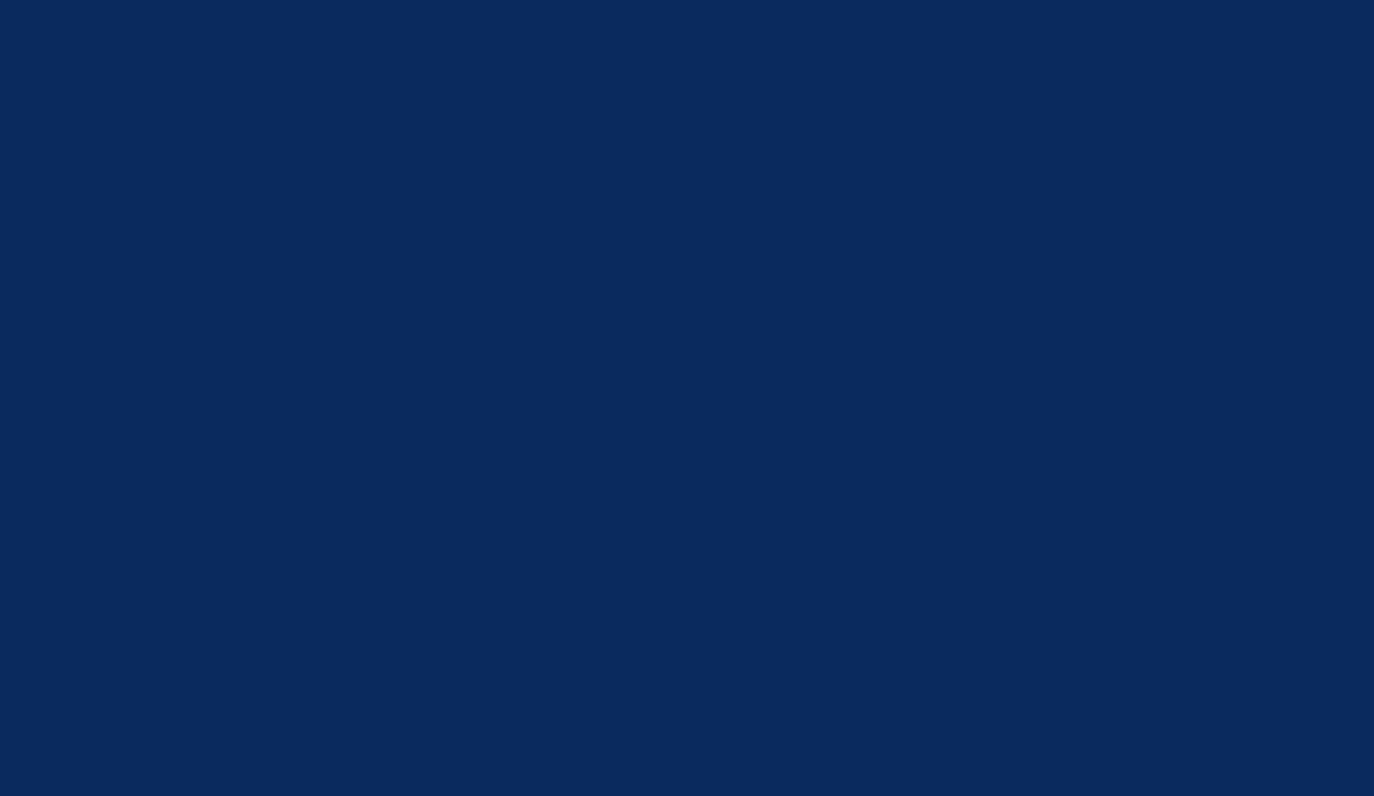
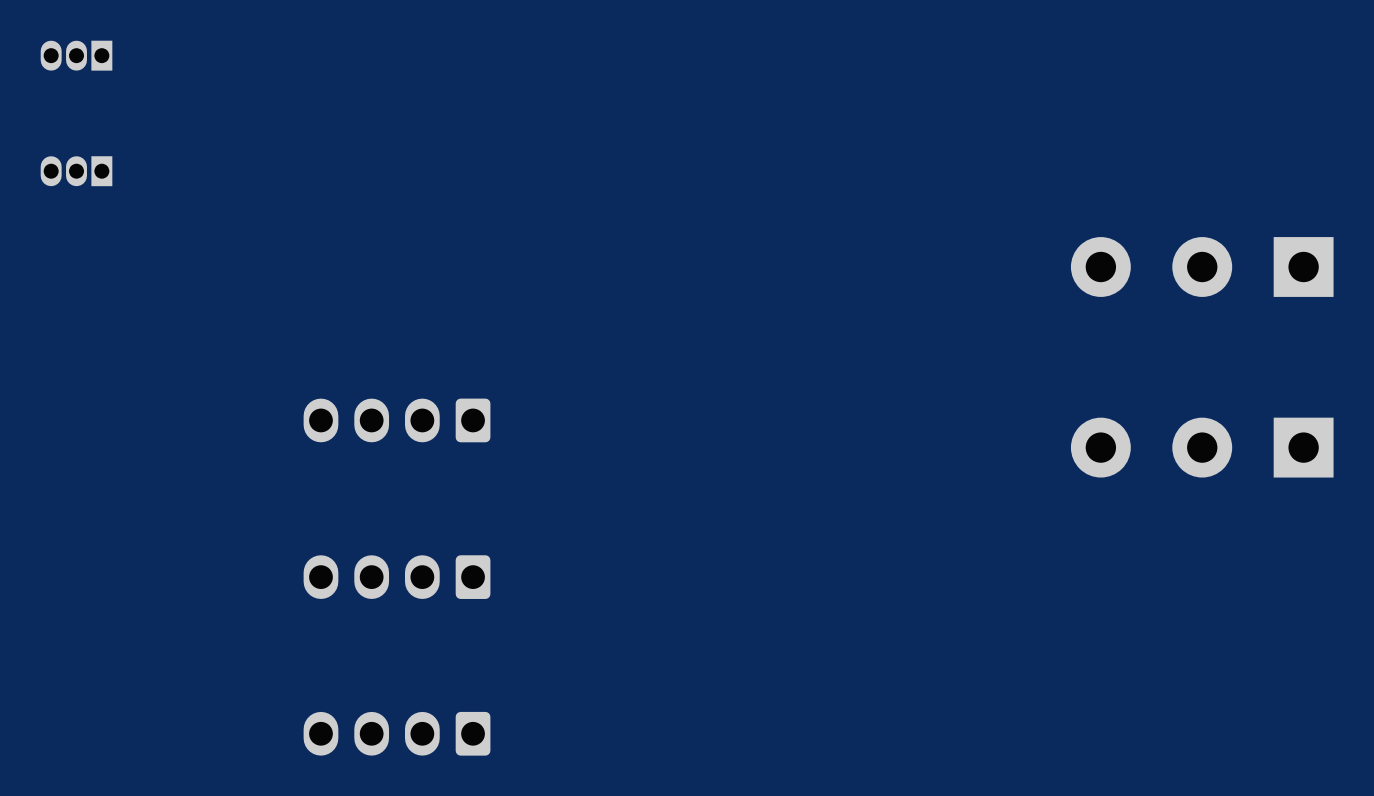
part: none -> (76, 55)
part: none -> (76, 171)
part: none -> (1202, 266)
part: none -> (397, 420)
part: none -> (1202, 447)
part: none -> (397, 577)
part: none -> (397, 733)

